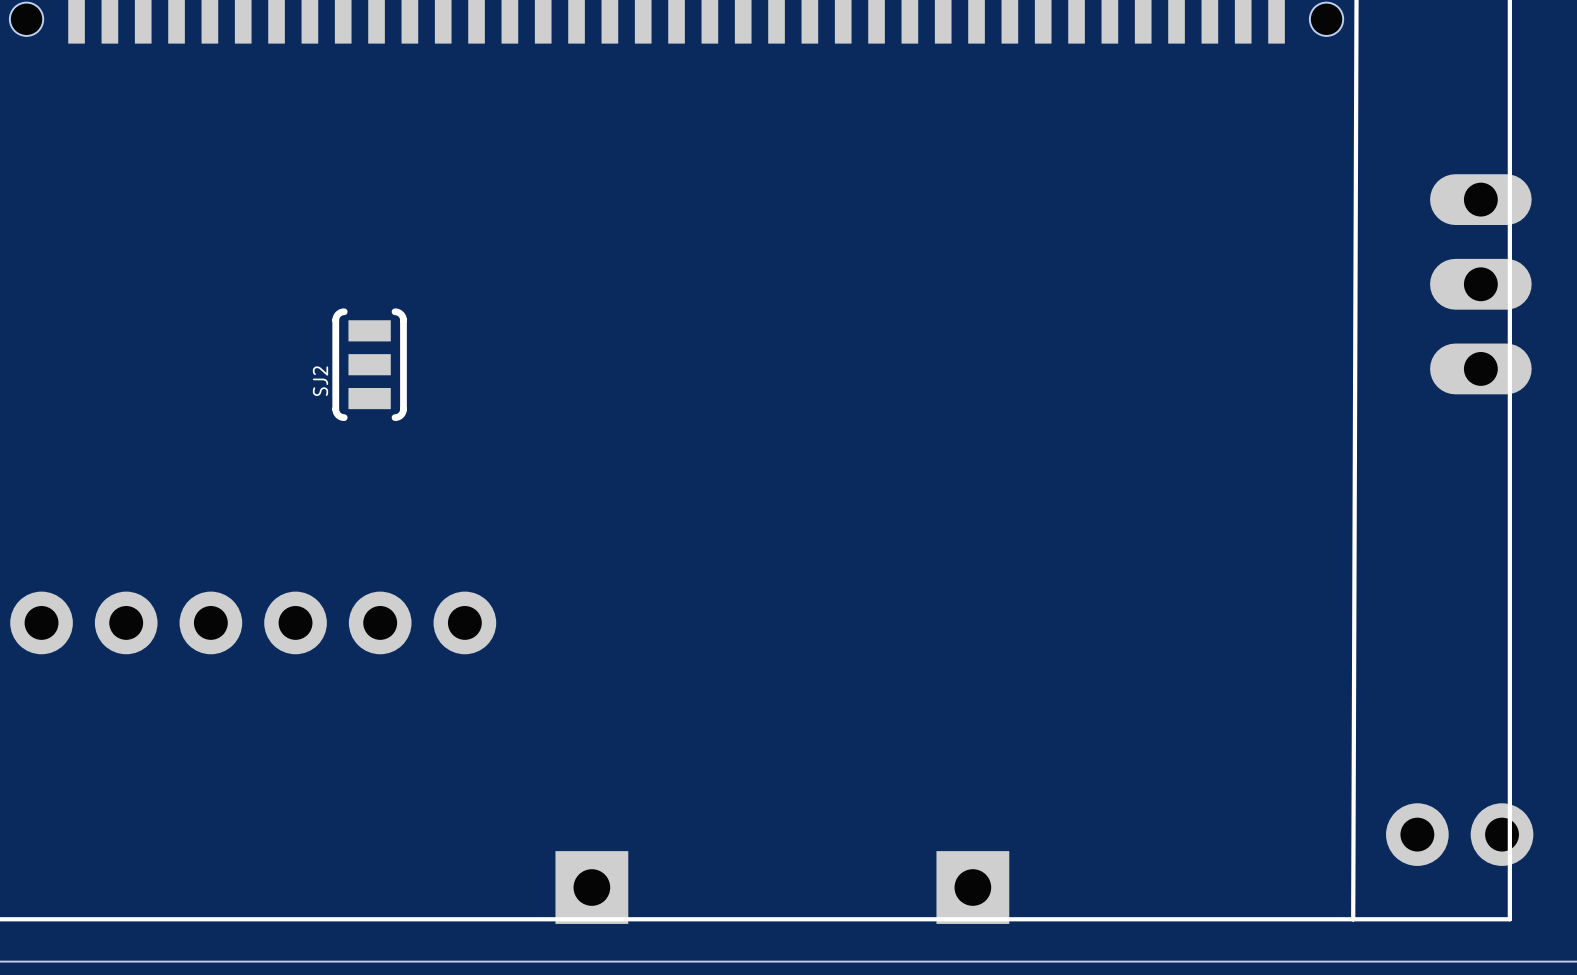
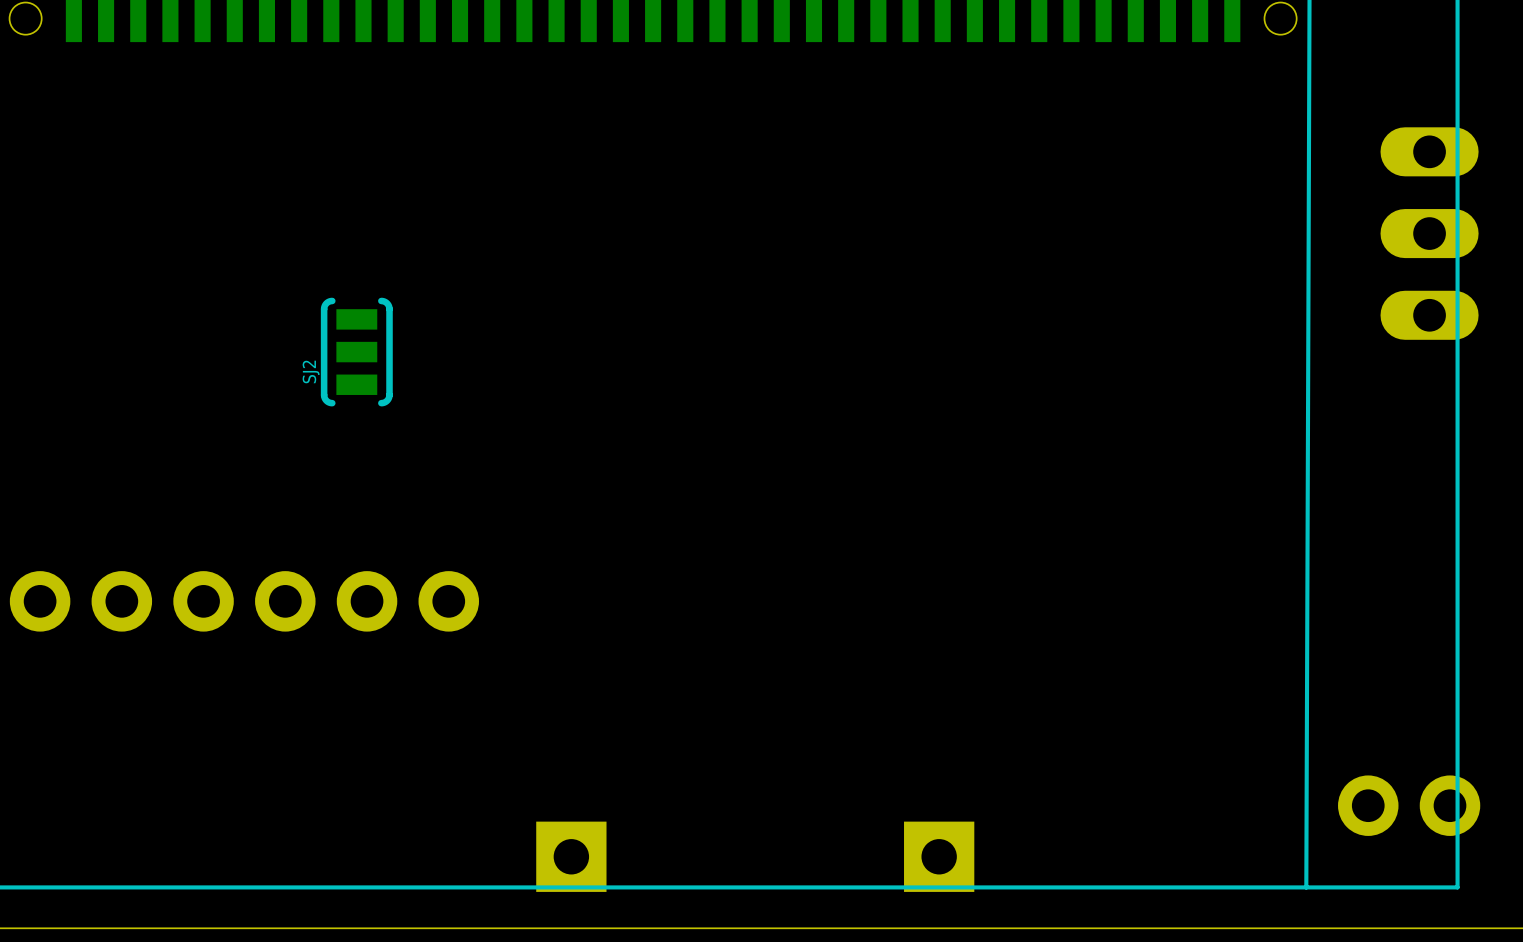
part position: (1480, 284) -> (1429, 233)

